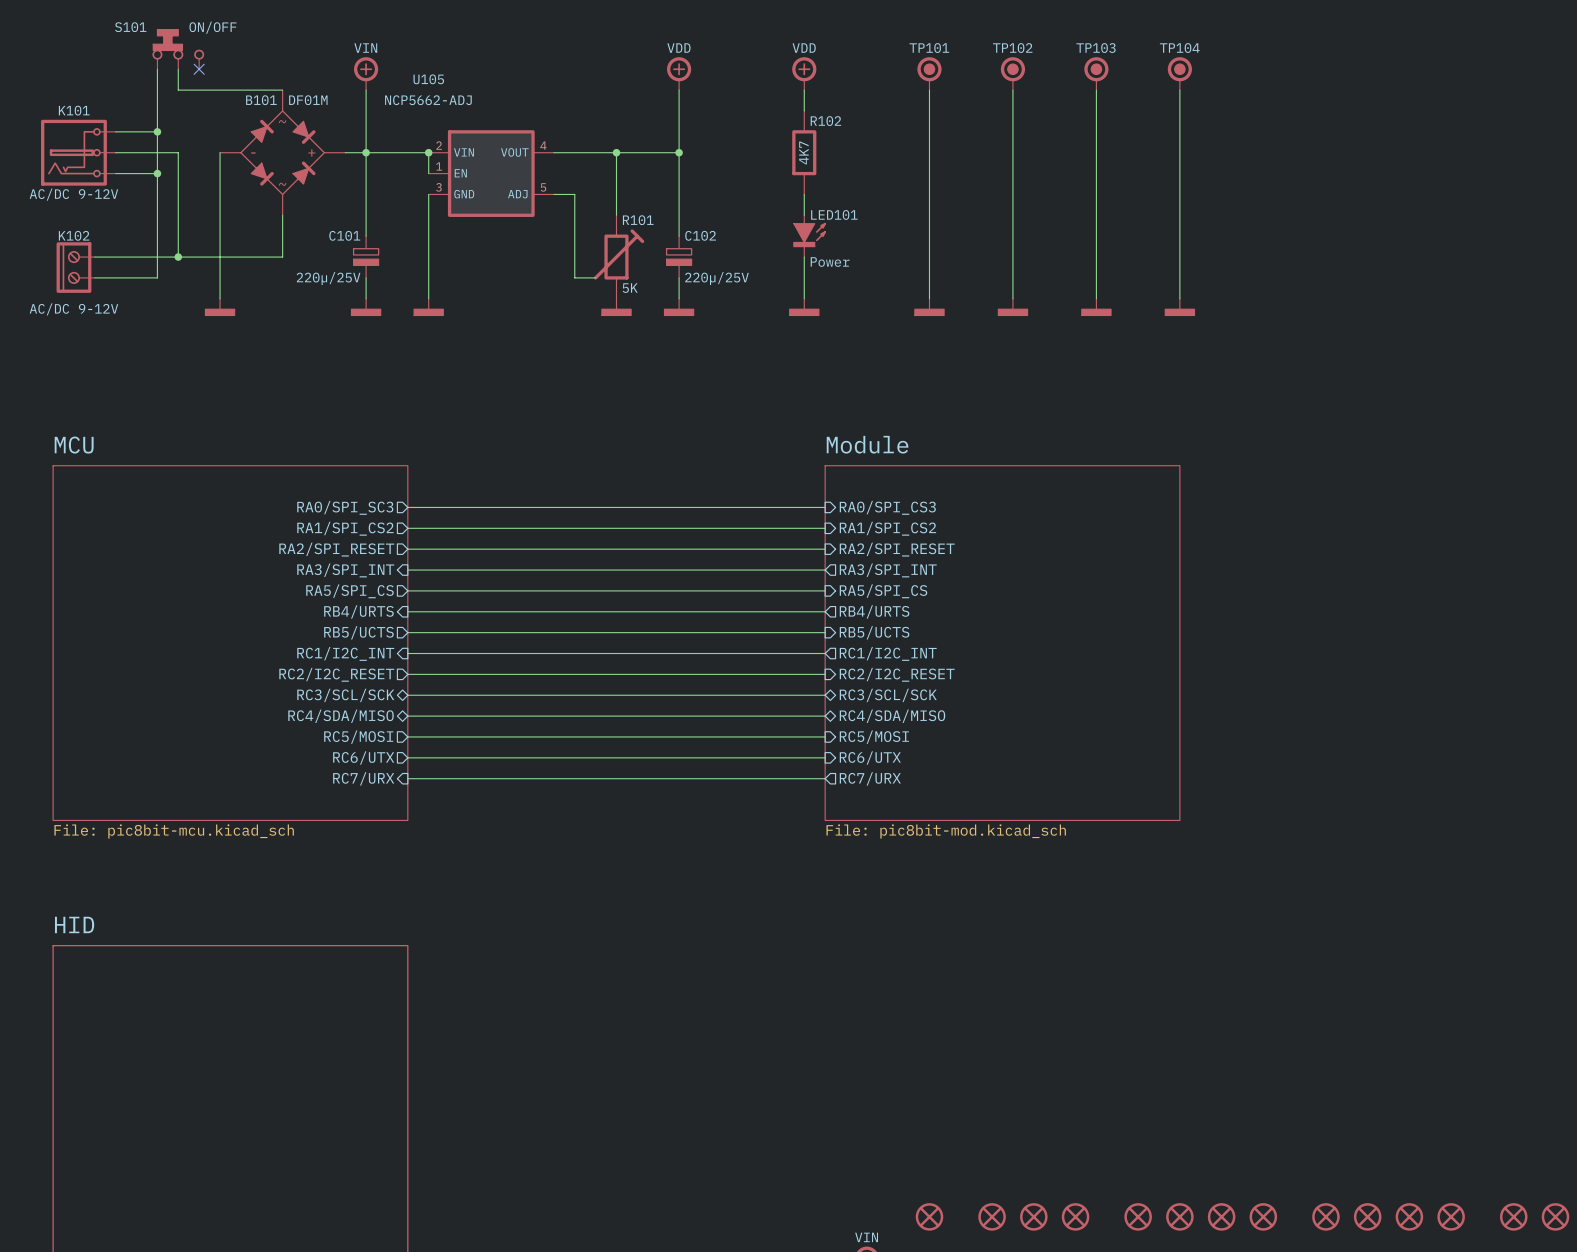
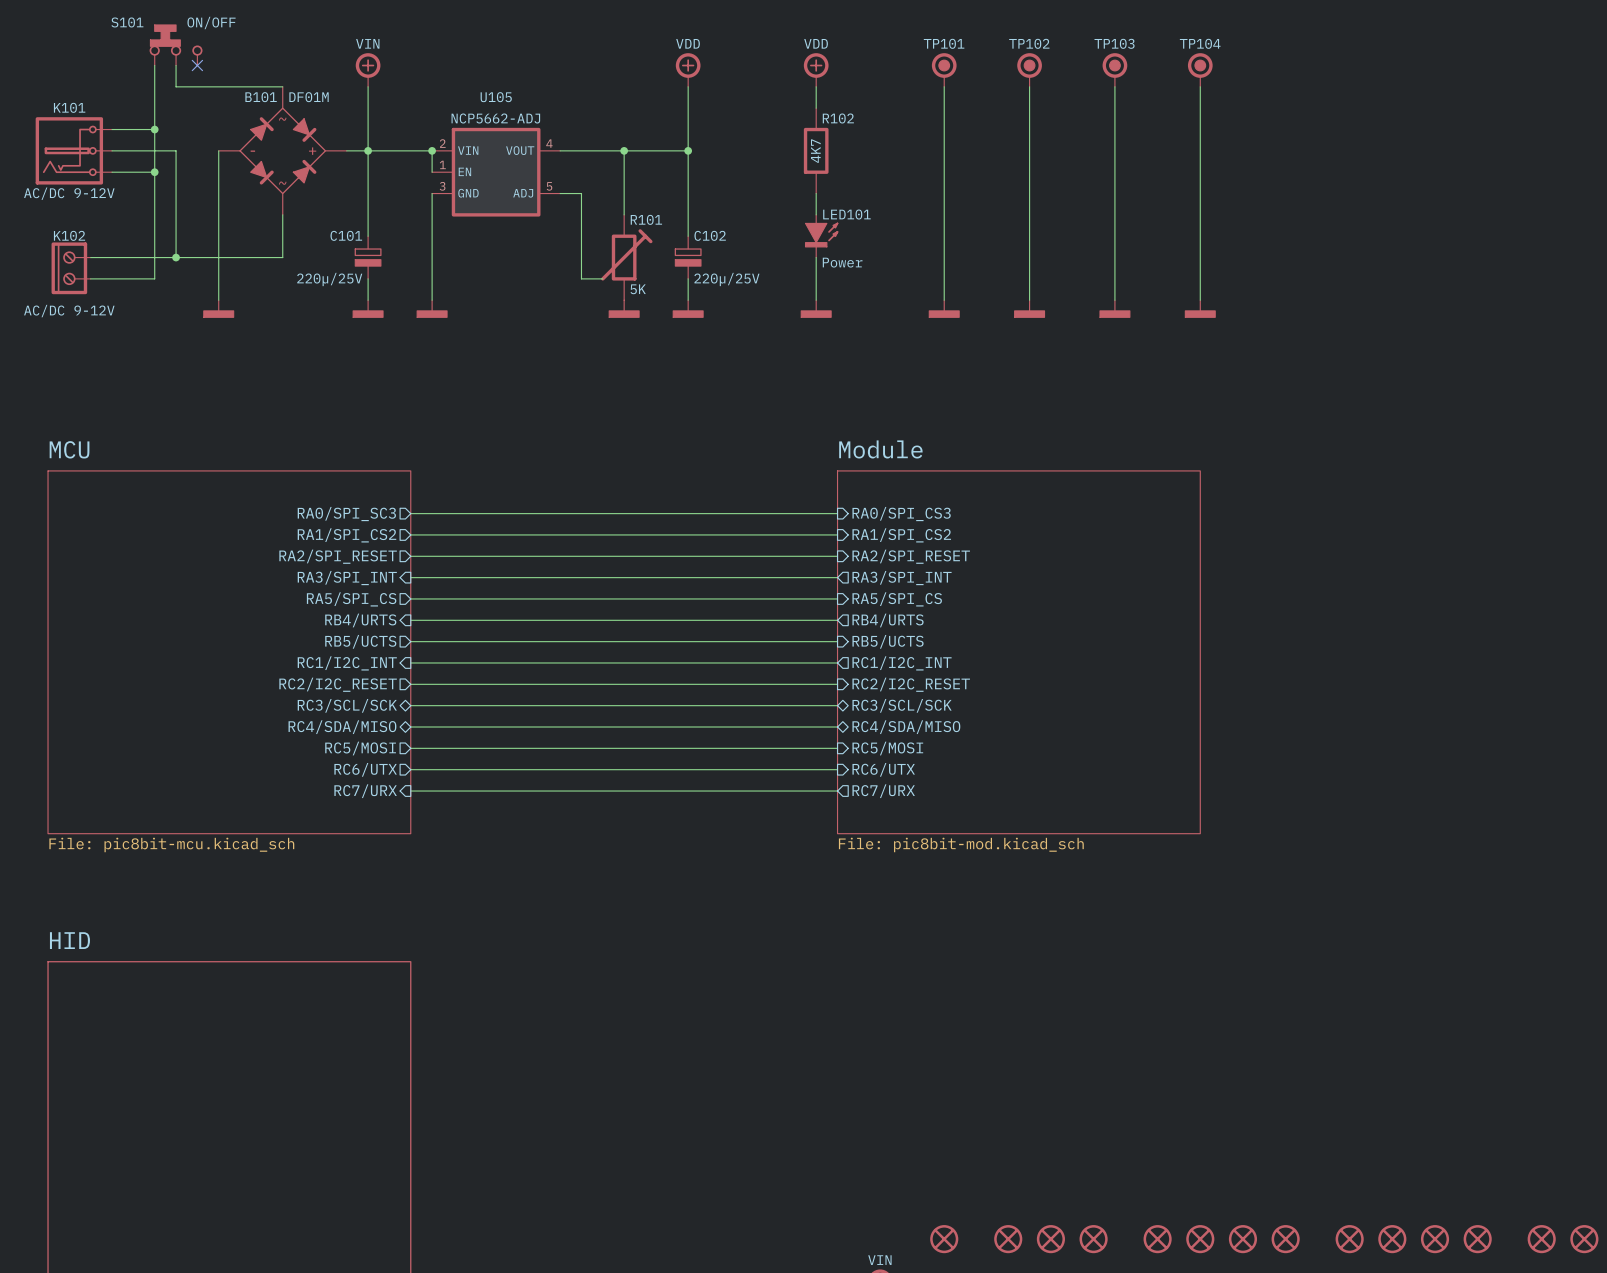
U105 name position: U105 (428, 79) -> U105 (496, 97)
U105 value position: NCP5662-ADJ (428, 100) -> NCP5662-ADJ (495, 118)

